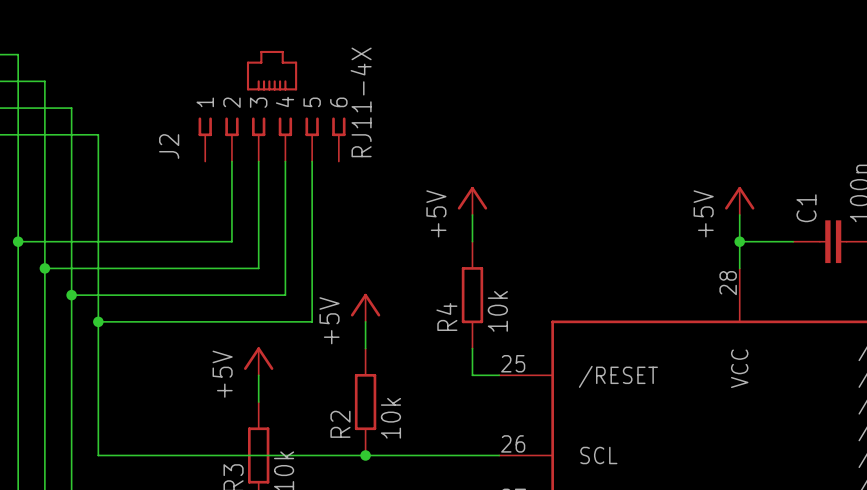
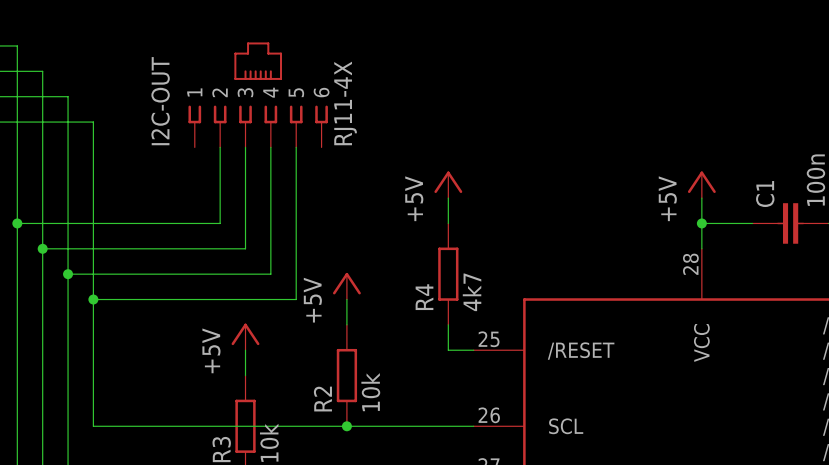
J2 name: J2 (169, 146) -> I2C-OUT (160, 101)
R4 value: 10k (497, 311) -> 4k7 (472, 292)

